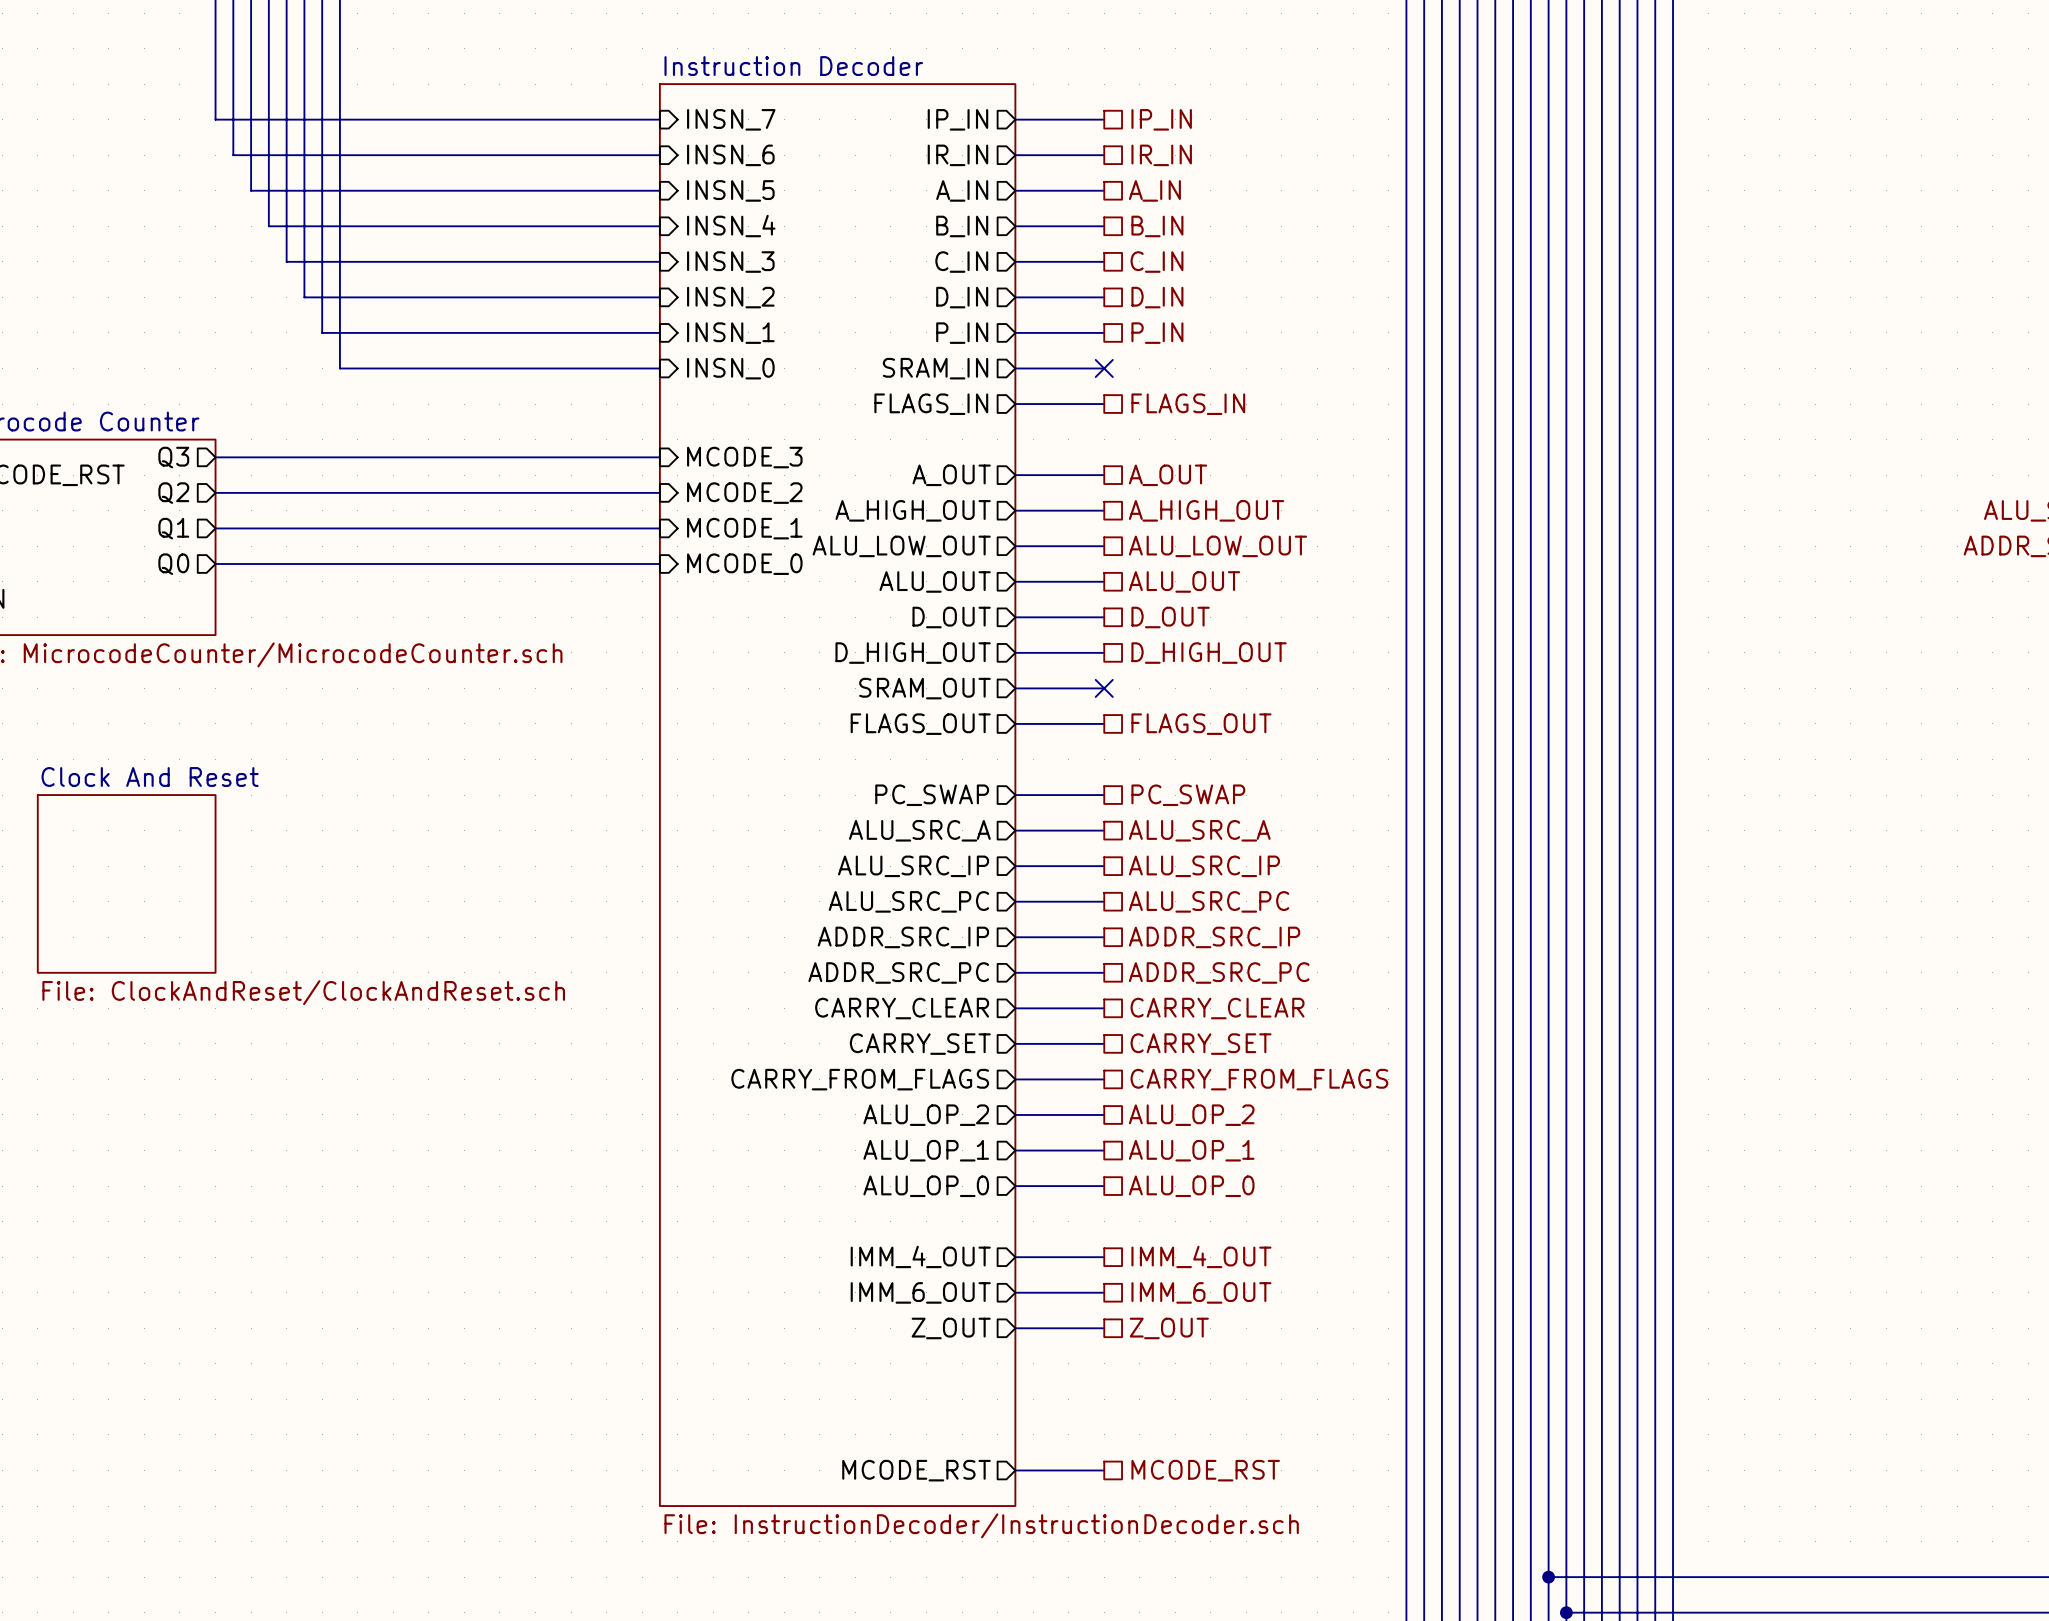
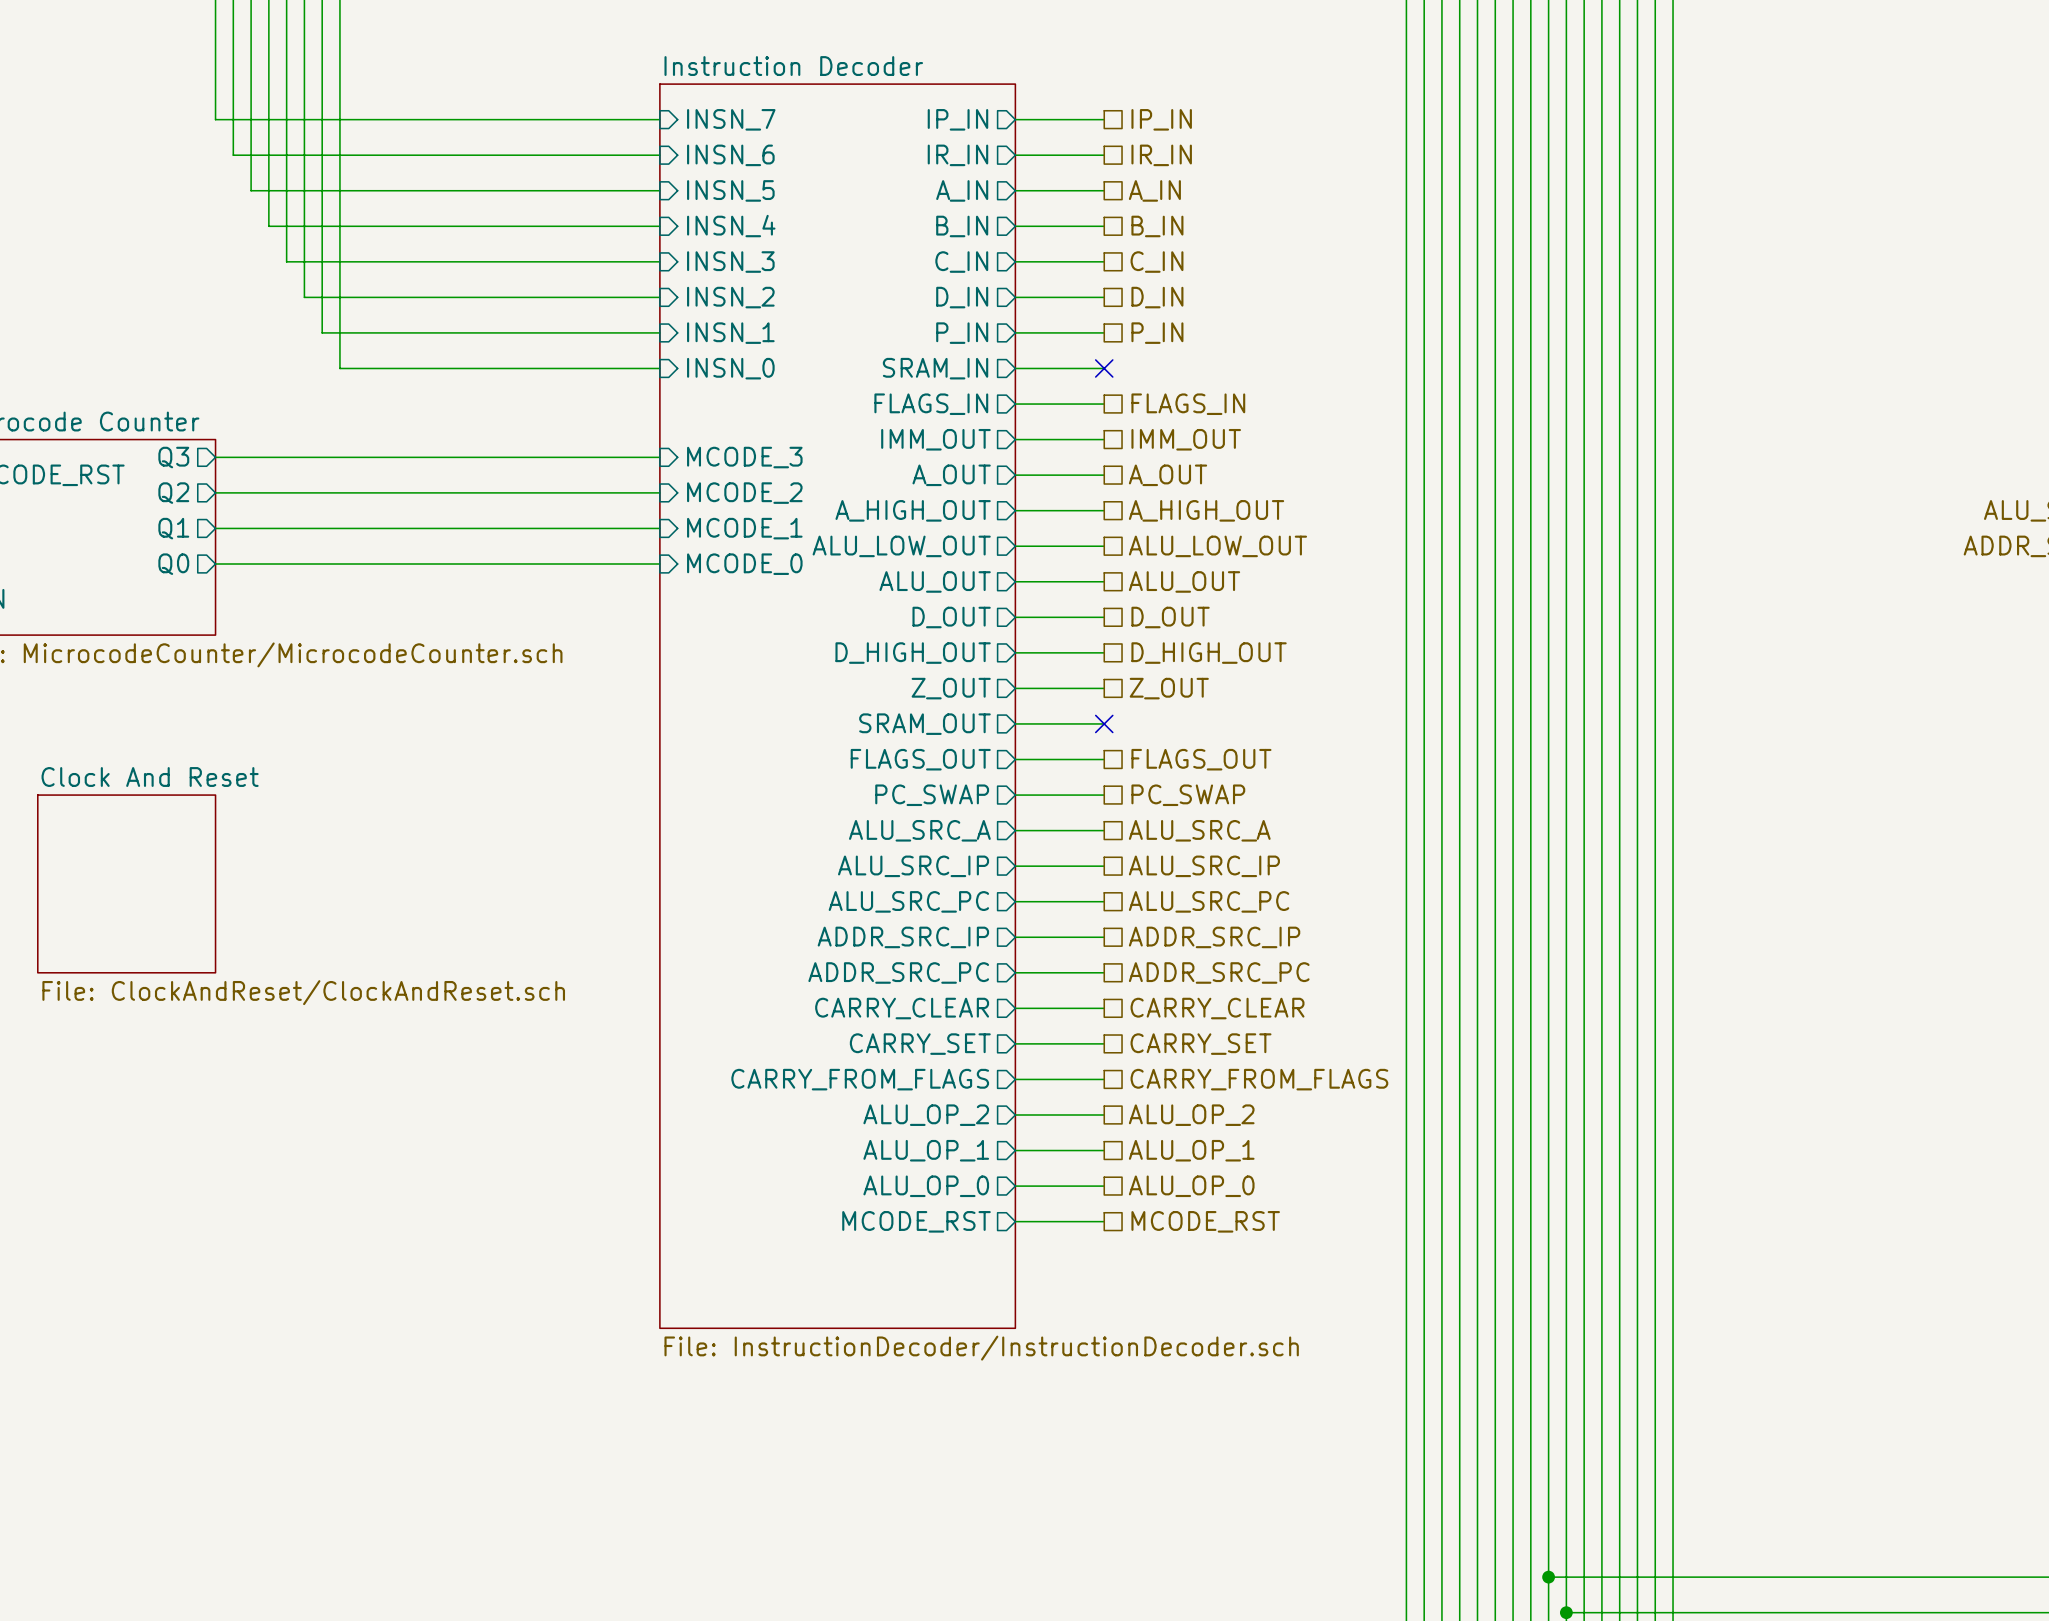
sheet pin: none -> IMM_OUT (935, 439)
wire: none -> (1015, 439) (1104, 439)
hierarchical label: none -> IMM_OUT (1186, 439)
sheet pin: SRAM_OUT (924, 688) -> Z_OUT (951, 688)
no-connect mark position: (1104, 688) -> (1104, 723)
hierarchical label: none -> Z_OUT (1169, 688)
sheet Instruction Decoder: none -> File: InstructionDecoder/InstructionDecoder.sch (837, 706)
sheet pin: FLAGS_OUT (920, 724) -> SRAM_OUT (924, 724)
hierarchical label position: FLAGS_OUT (1201, 724) -> FLAGS_OUT (1201, 759)
sheet pin: none -> FLAGS_OUT (920, 759)
wire: none -> (1015, 759) (1104, 759)
sheet Instruction Decoder: File: InstructionDecoder/InstructionDecoder.sch (837, 795) -> none
sheet pin: IMM_4_OUT (920, 1256) -> none
hierarchical label: IMM_4_OUT (1201, 1256) -> none
wire: (1015, 1257) (1104, 1257) -> (1015, 1221) (1104, 1221)
sheet pin: IMM_6_OUT (920, 1292) -> none
wire: (1015, 1292) (1104, 1292) -> none
hierarchical label: IMM_6_OUT (1201, 1292) -> none
sheet pin: Z_OUT (951, 1328) -> none
wire: (1015, 1328) (1104, 1328) -> none
hierarchical label: Z_OUT (1169, 1328) -> none
sheet pin position: MCODE_RST (916, 1470) -> MCODE_RST (916, 1221)
wire: (1015, 1470) (1104, 1470) -> none
hierarchical label position: MCODE_RST (1205, 1470) -> MCODE_RST (1205, 1221)

